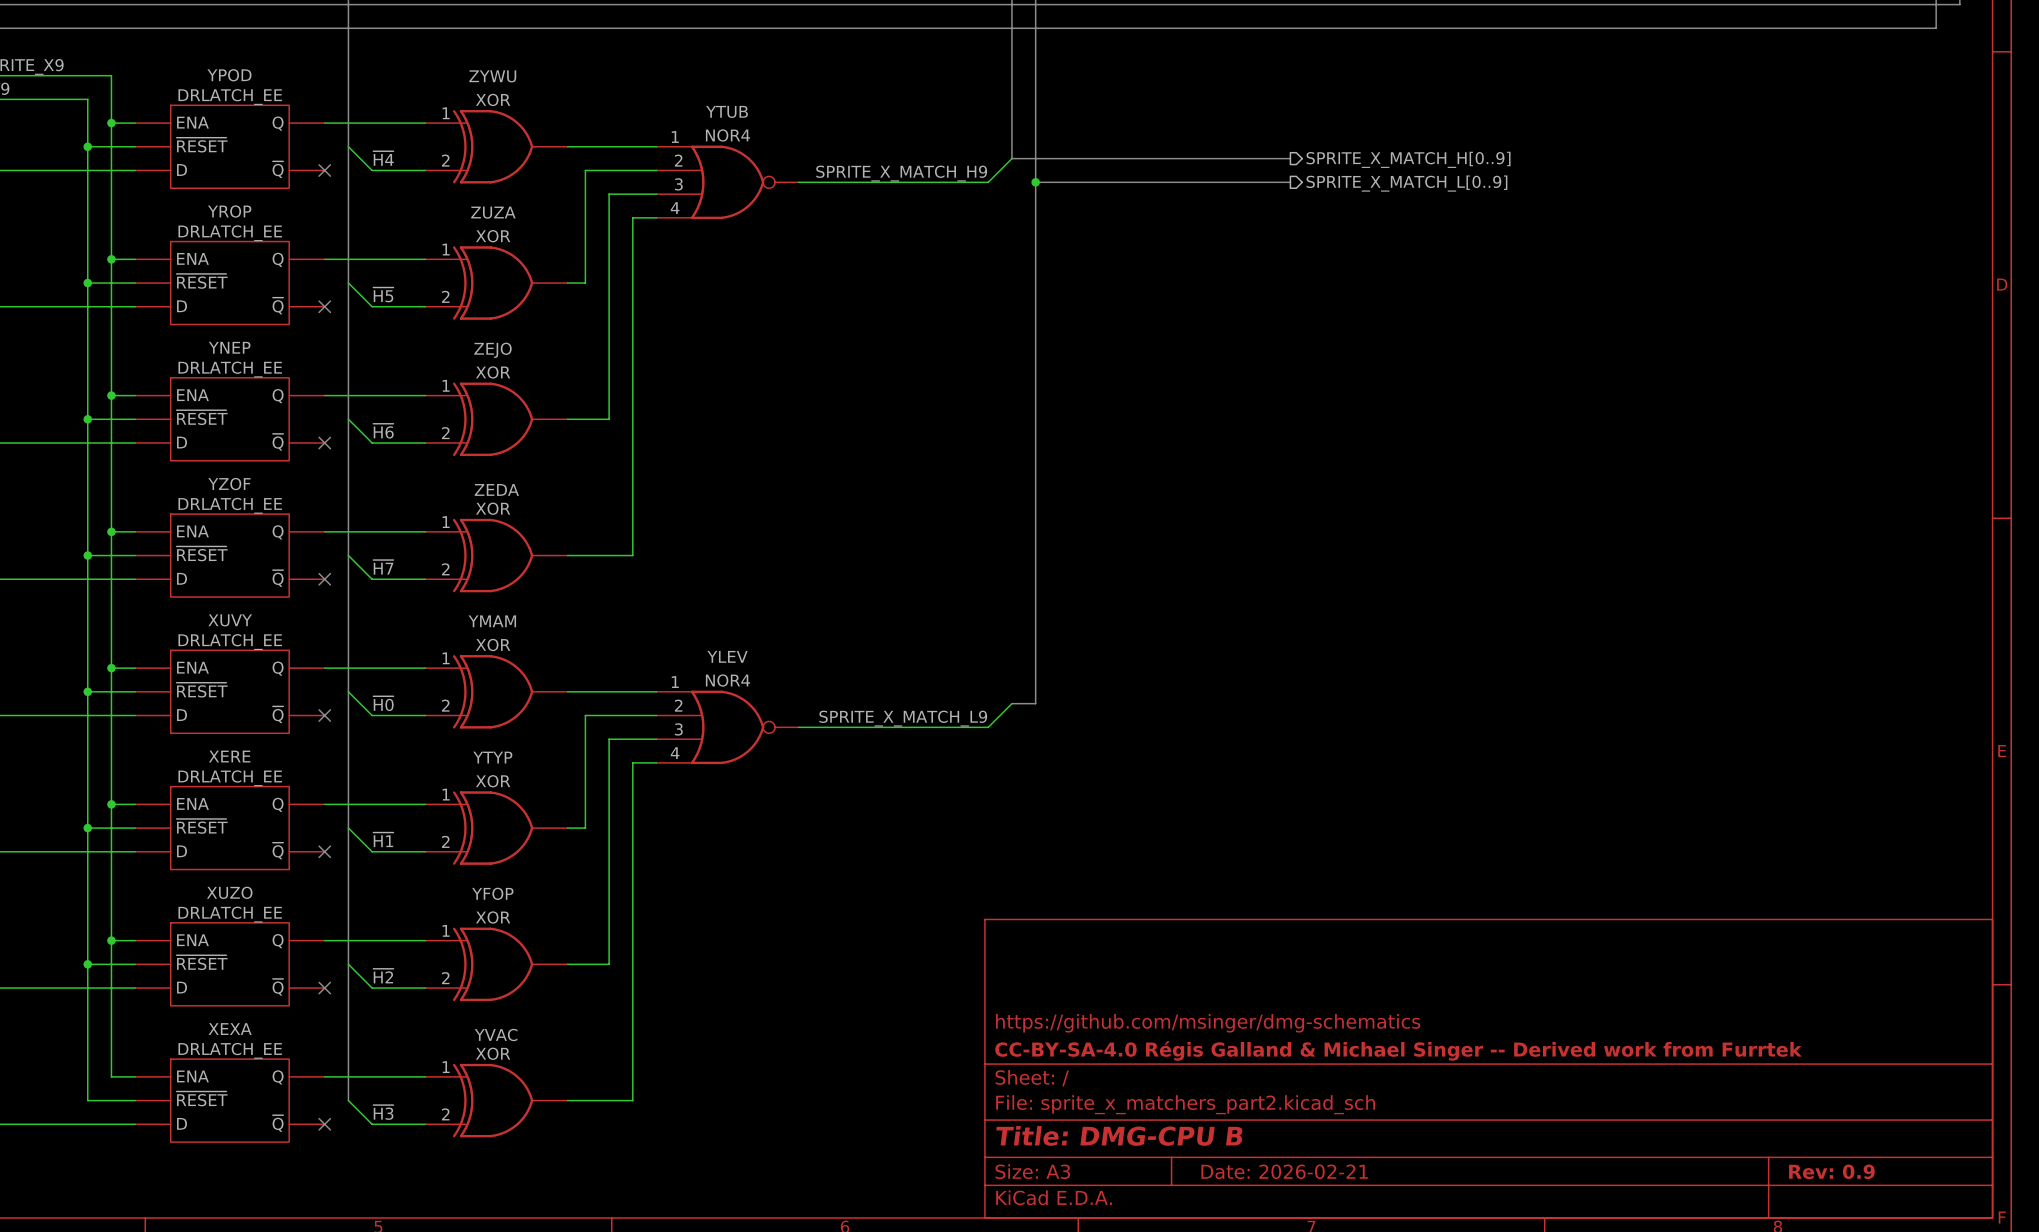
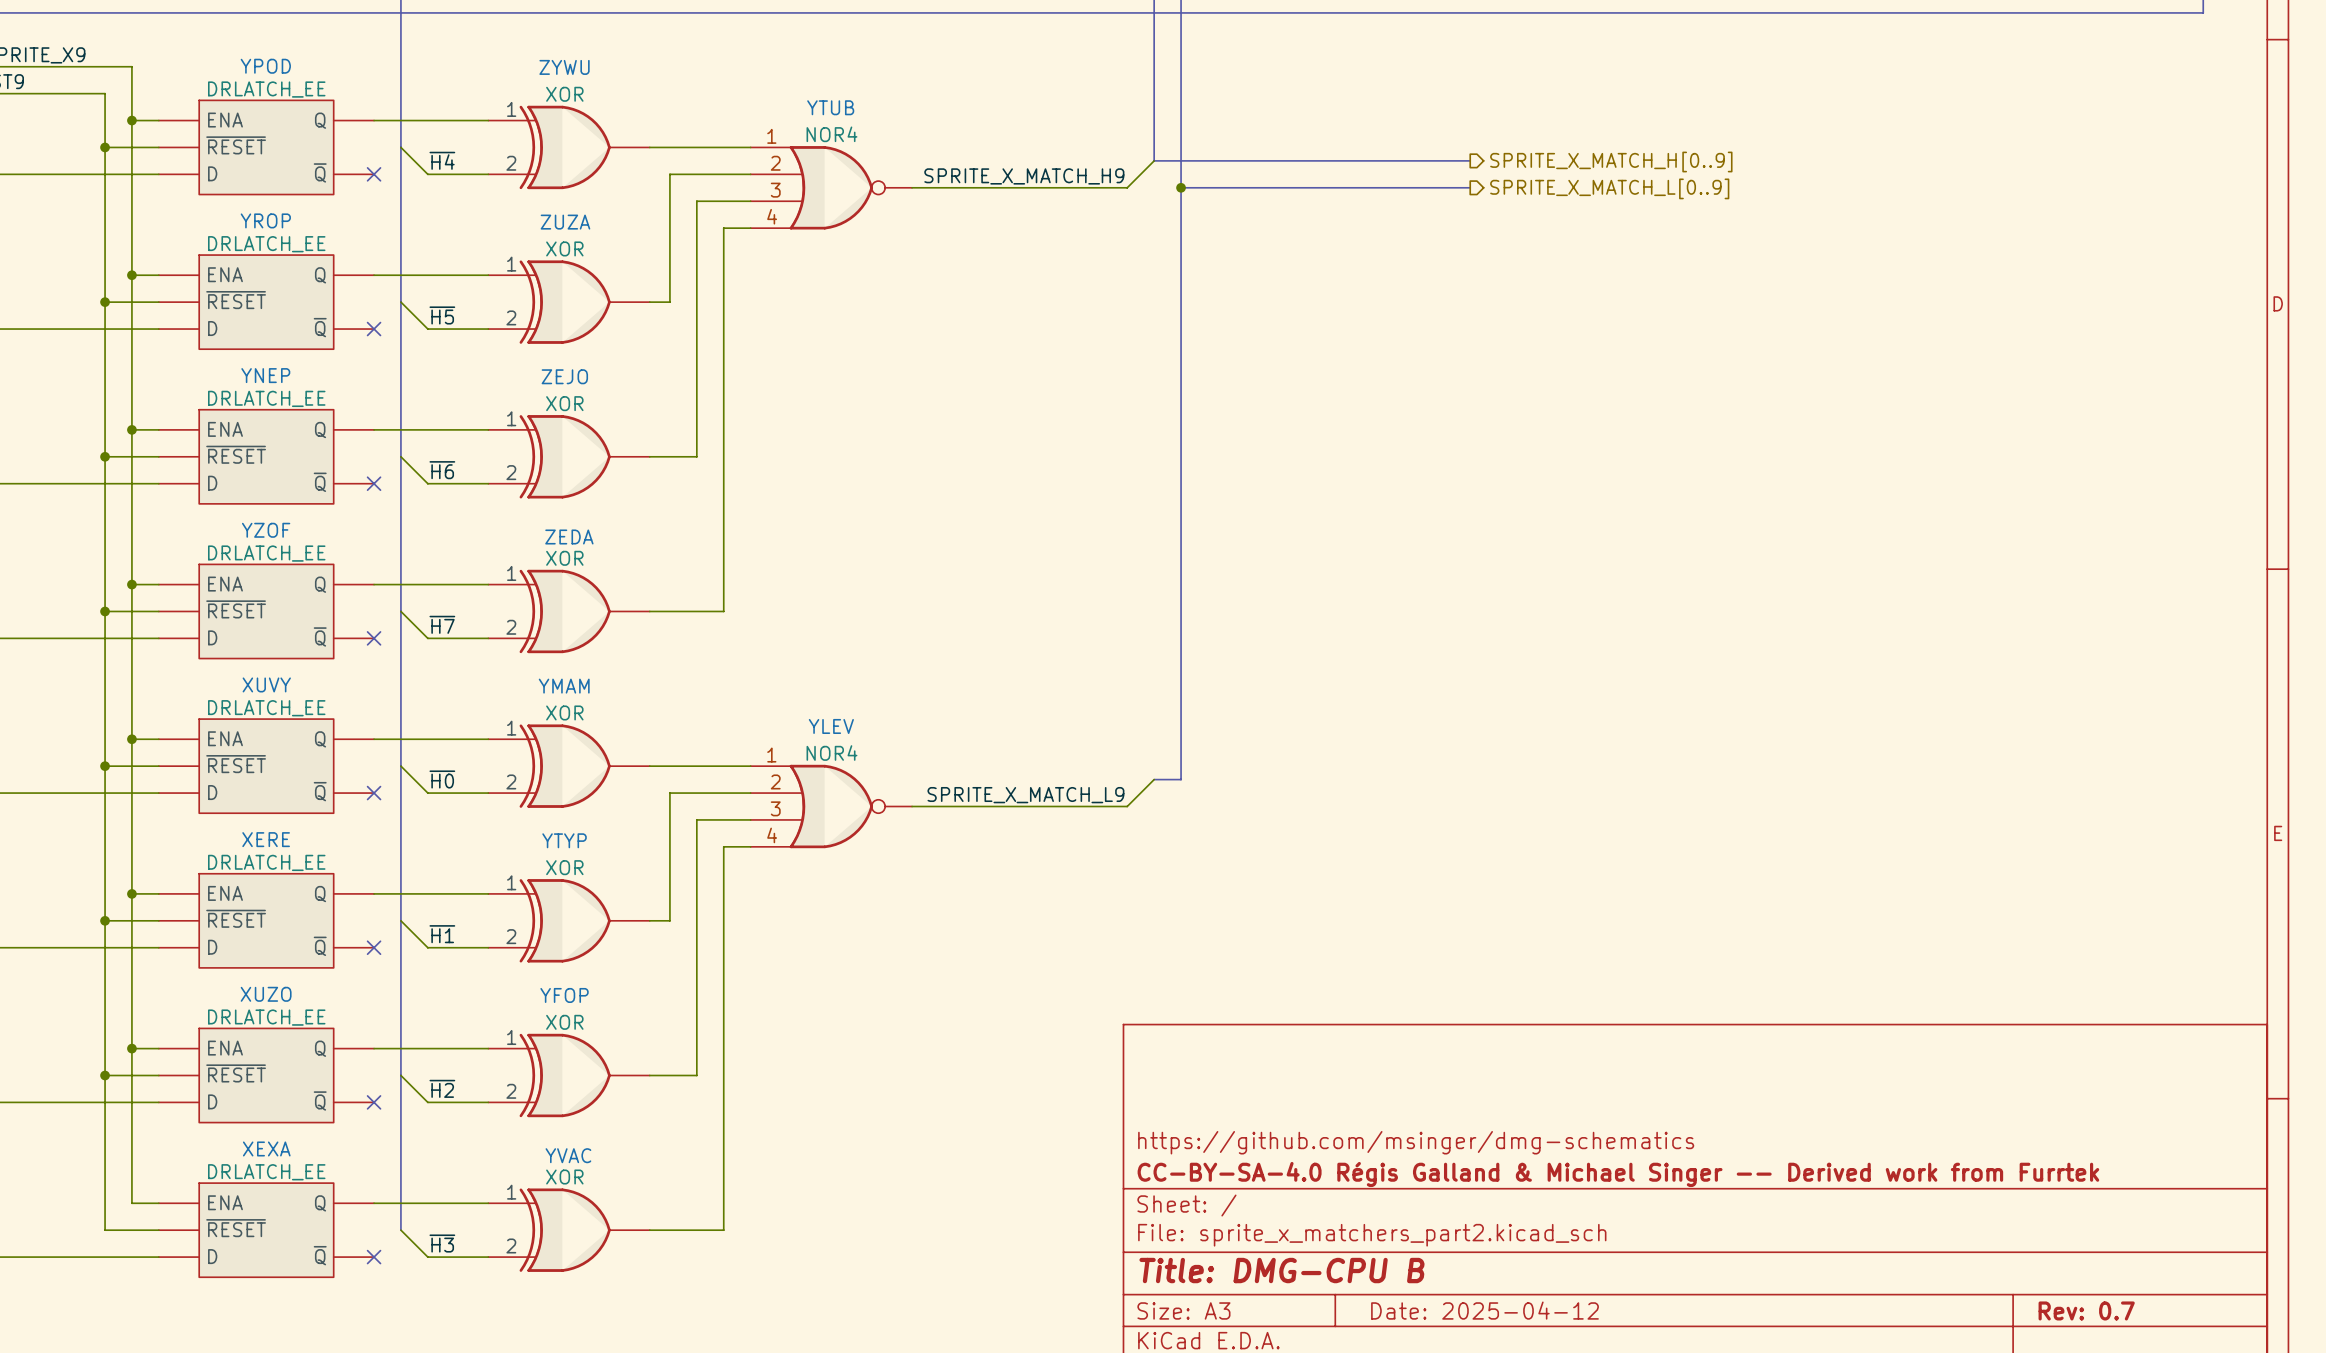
title block: Date: 2026-02-21 (1284, 1171) -> Date: 2025-04-12 (1485, 1310)
title block: Rev: 0.9 (1831, 1171) -> Rev: 0.7 (2086, 1310)

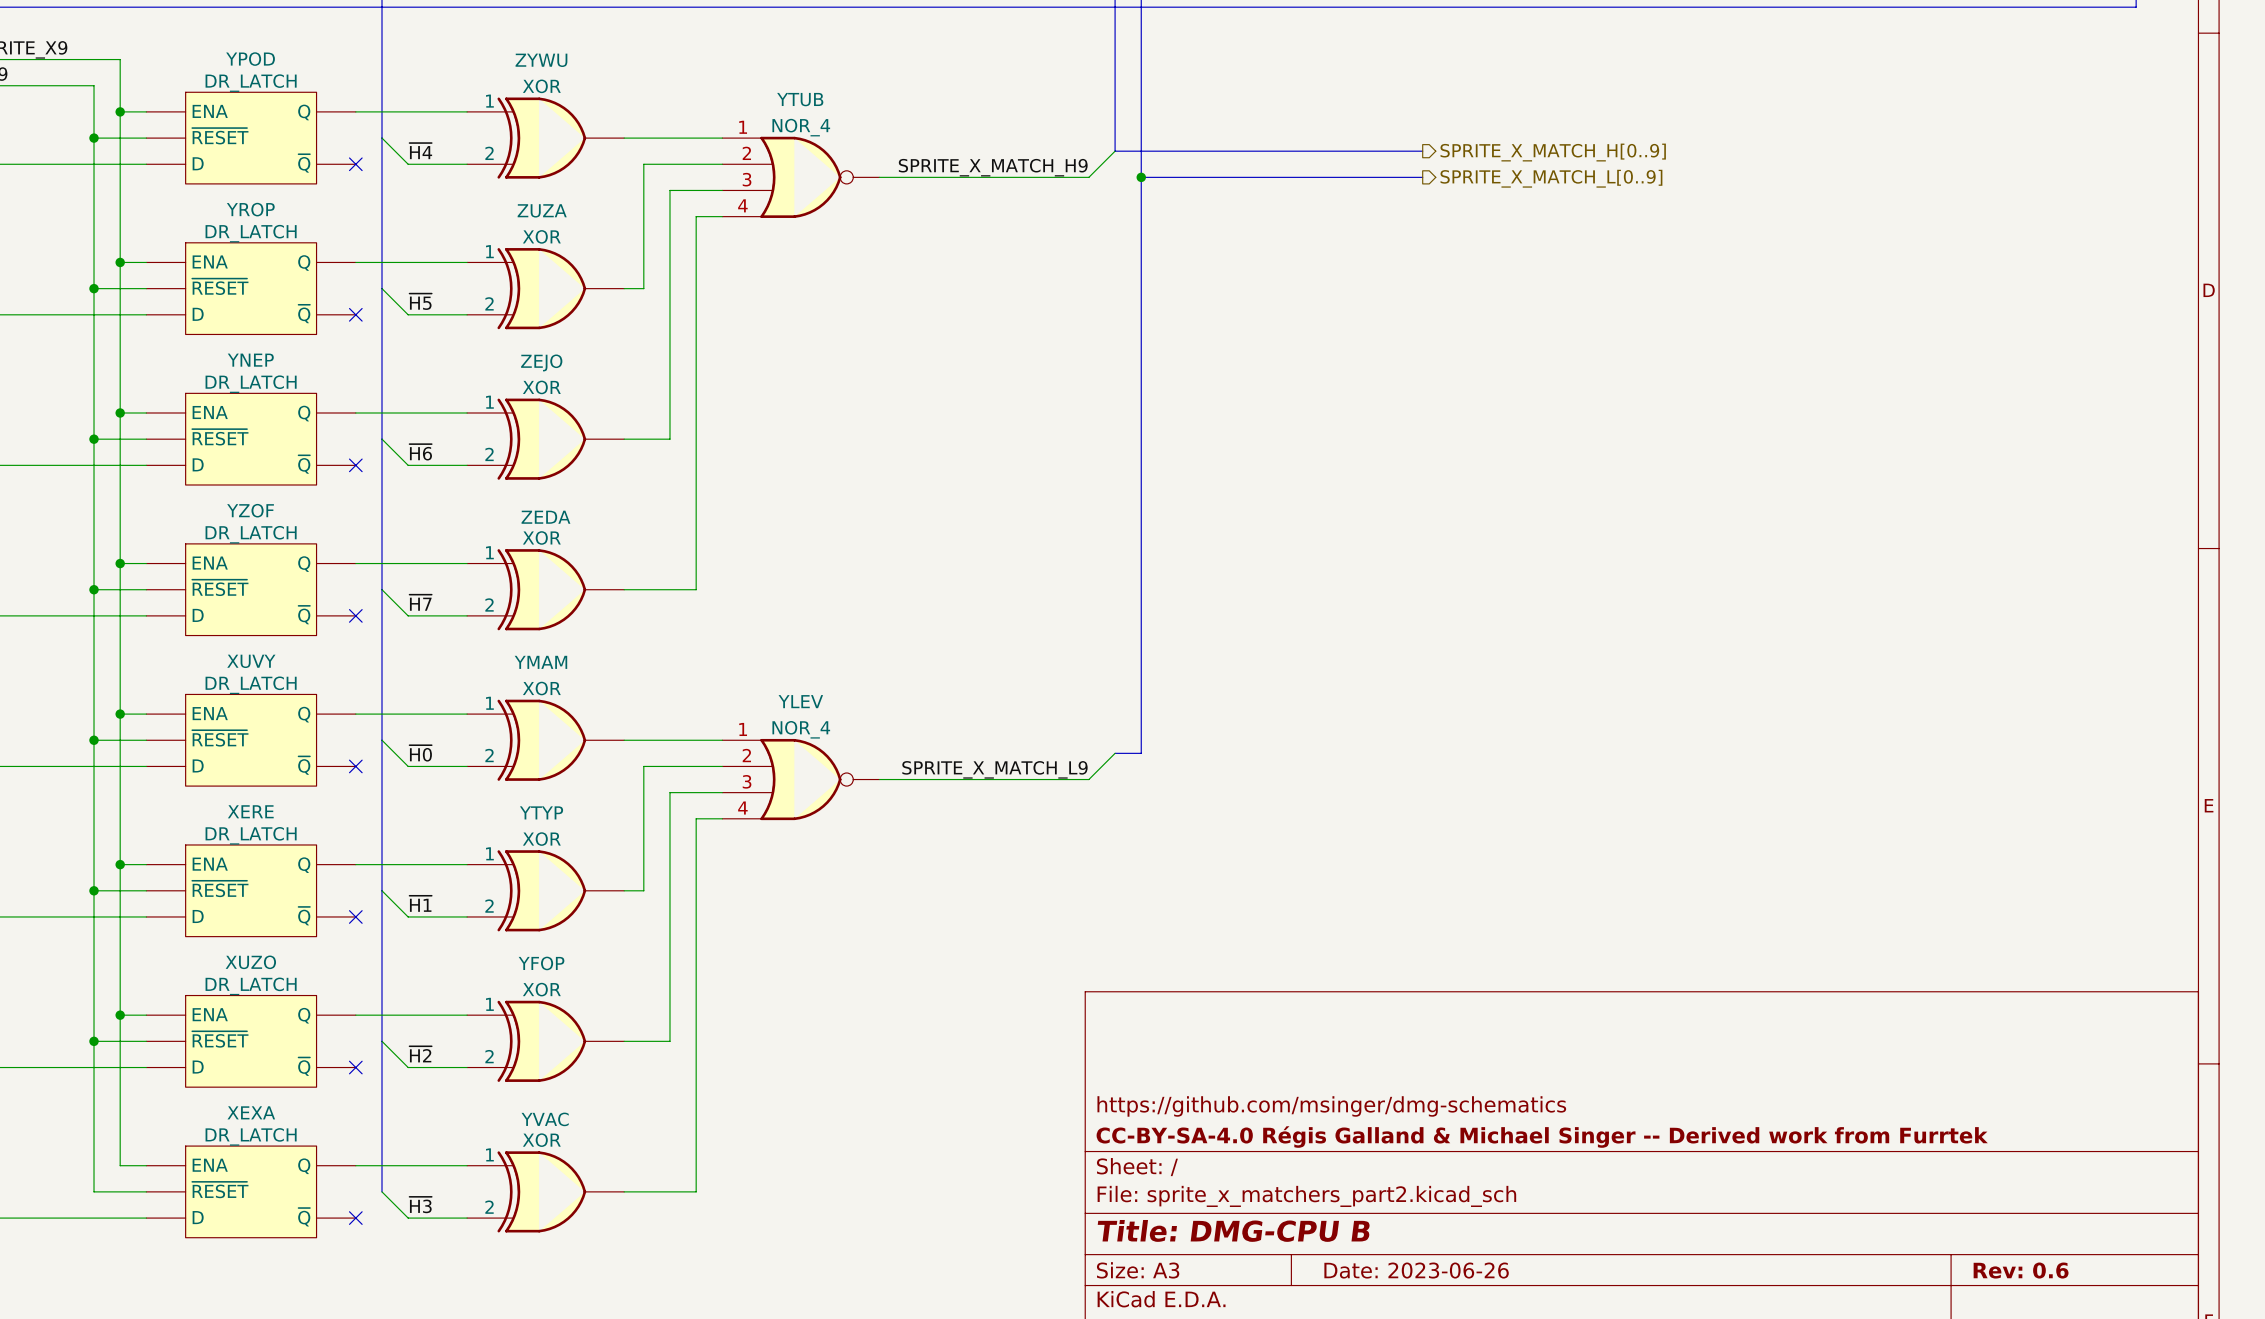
YPOD value: DRLATCH_EE (266, 89) -> DR_LATCH (251, 83)
YTUB value: NOR4 (831, 134) -> NOR_4 (801, 127)
YROP value: DRLATCH_EE (266, 244) -> DR_LATCH (251, 233)
YNEP value: DRLATCH_EE (266, 398) -> DR_LATCH (251, 384)
YZOF value: DRLATCH_EE (266, 553) -> DR_LATCH (251, 534)
XUVY value: DRLATCH_EE (266, 708) -> DR_LATCH (251, 685)
YLEV value: NOR4 (831, 753) -> NOR_4 (801, 729)
XERE value: DRLATCH_EE (266, 862) -> DR_LATCH (251, 835)
XUZO value: DRLATCH_EE (266, 1017) -> DR_LATCH (251, 986)
XEXA value: DRLATCH_EE (266, 1172) -> DR_LATCH (251, 1136)
title block: Date: 2025-04-12 (1485, 1310) -> Date: 2023-06-26 (1416, 1270)
title block: Rev: 0.7 (2086, 1310) -> Rev: 0.6 (2021, 1270)

